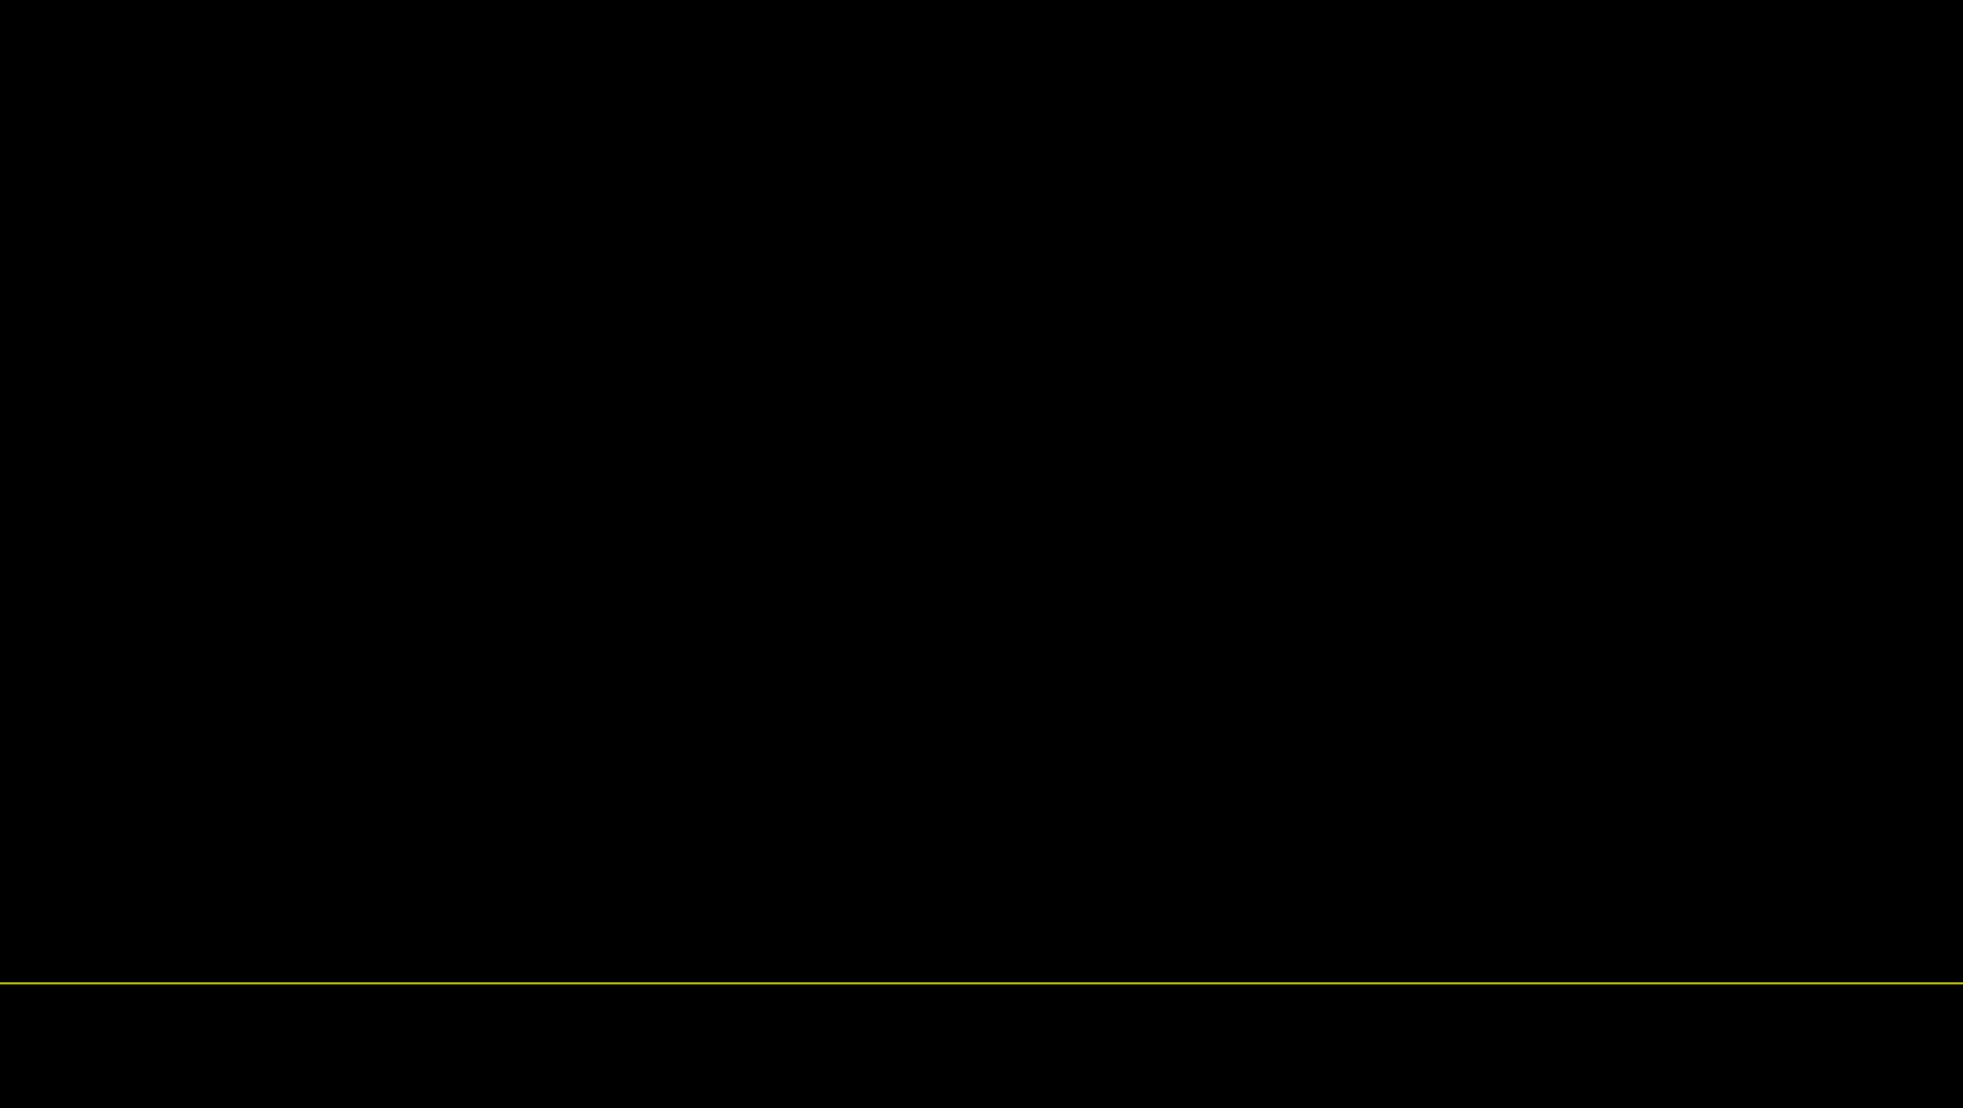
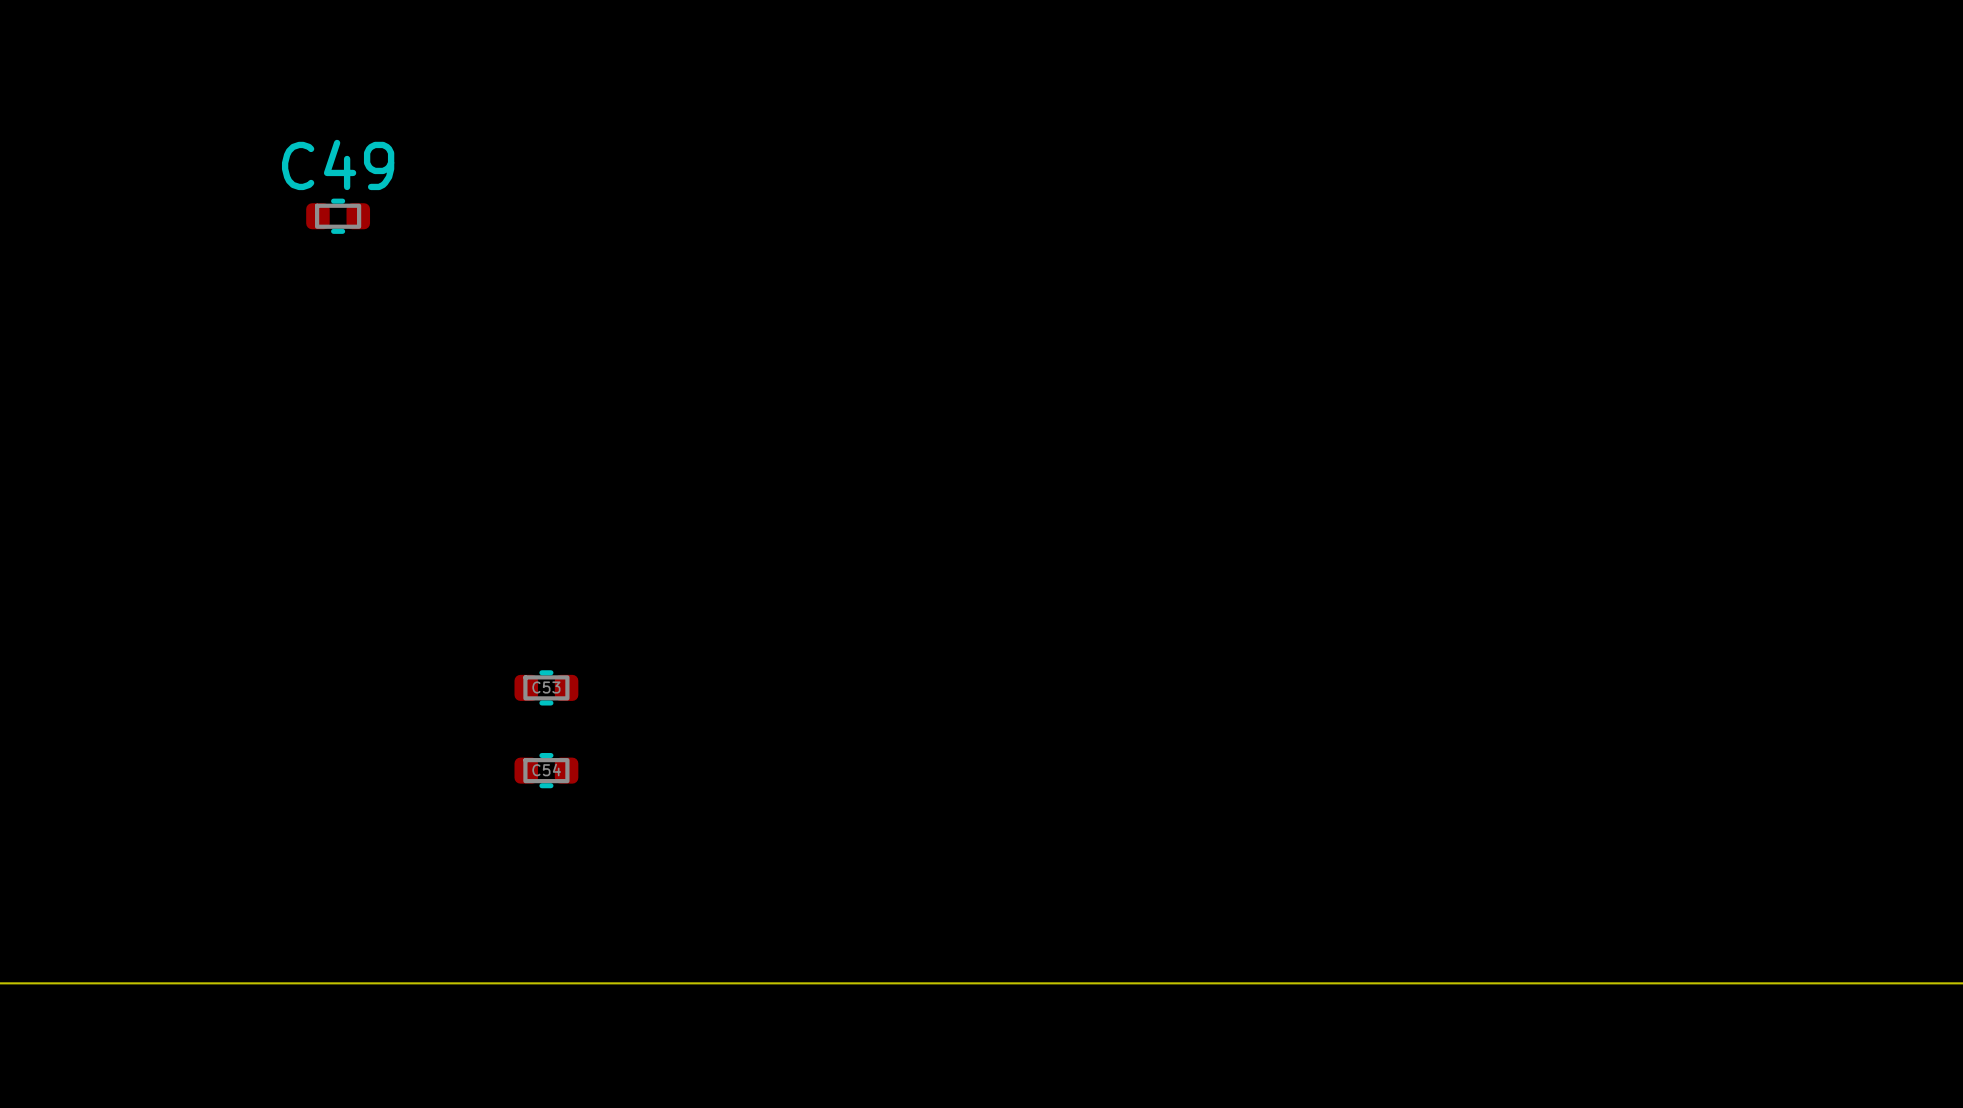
C49: none -> (338, 216)
C53: none -> (546, 687)
C54: none -> (546, 770)

